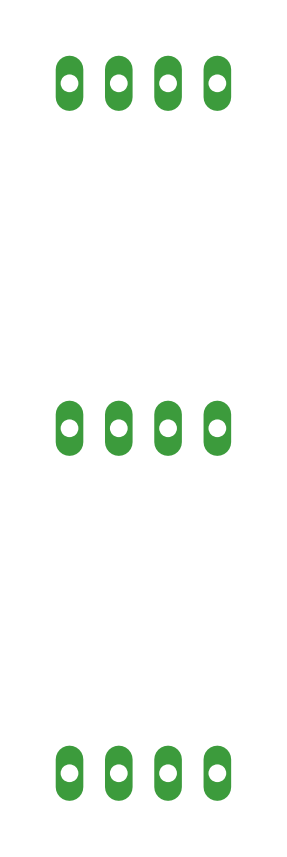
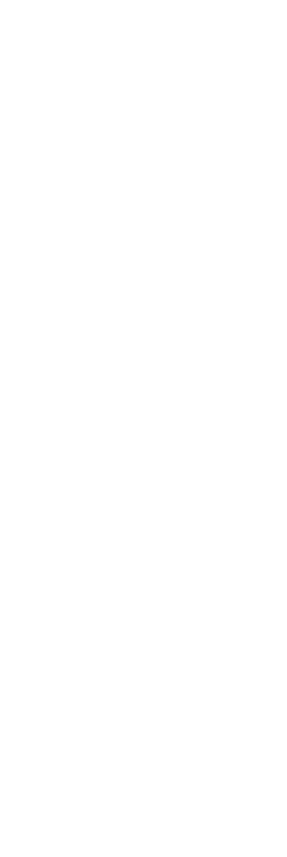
part: (143, 83) -> none
part: (143, 428) -> none
part: (143, 773) -> none

